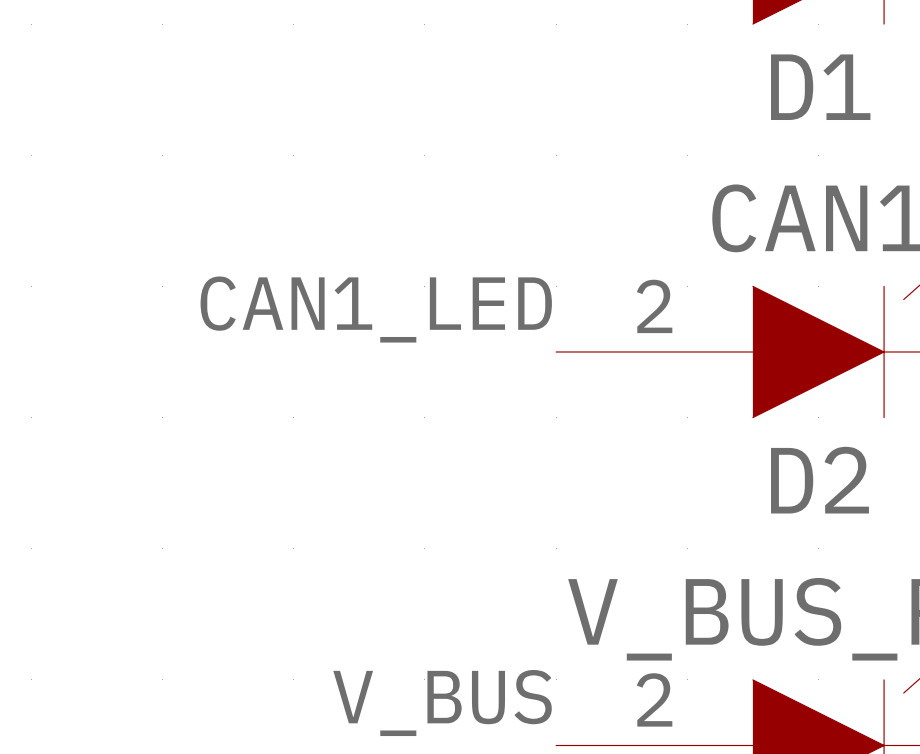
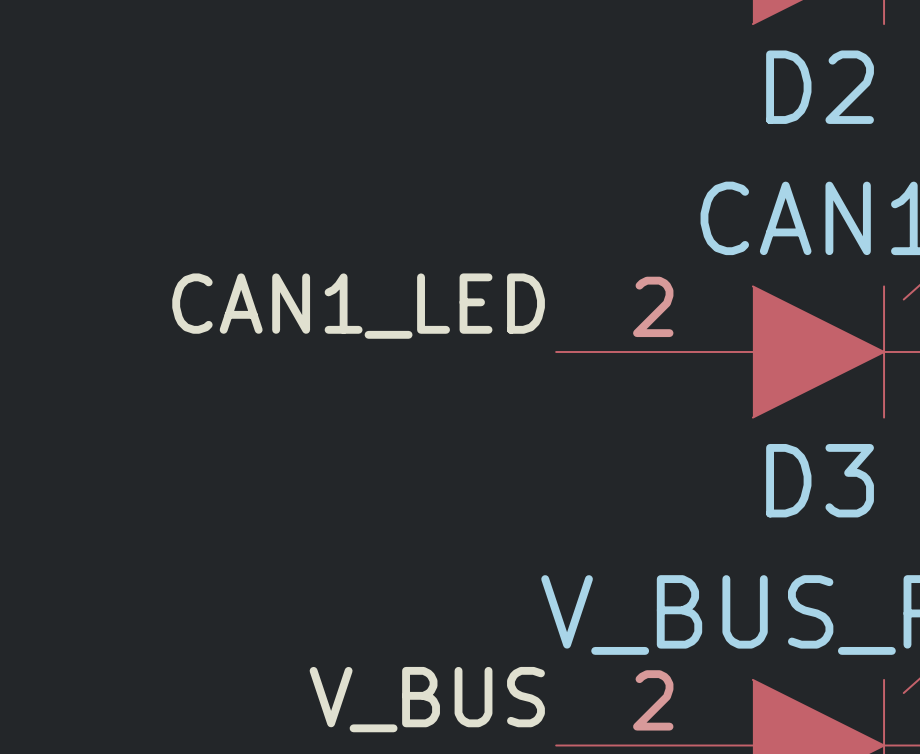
D1 name: D1 (820, 87) -> D2 (820, 87)
D2 name: D2 (819, 480) -> D3 (820, 480)

